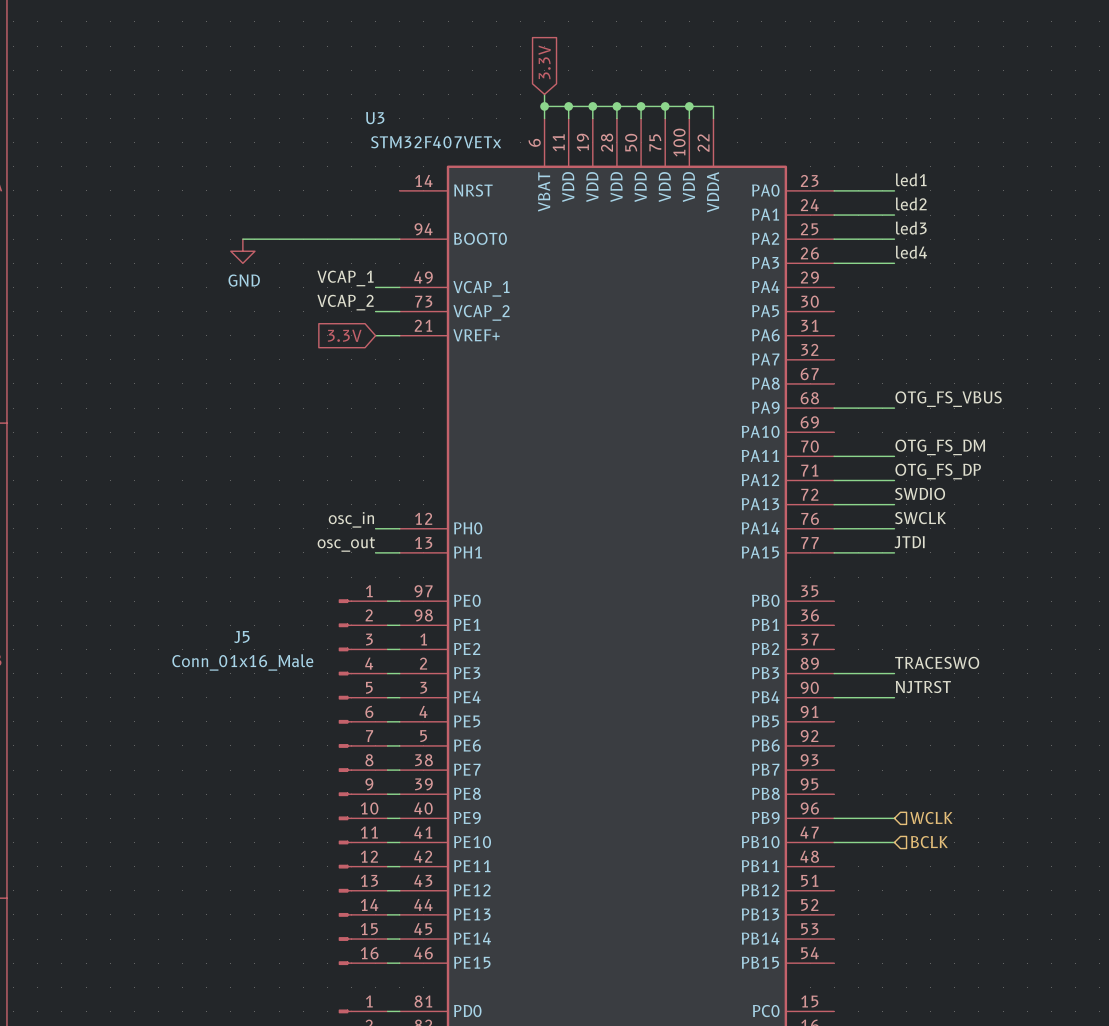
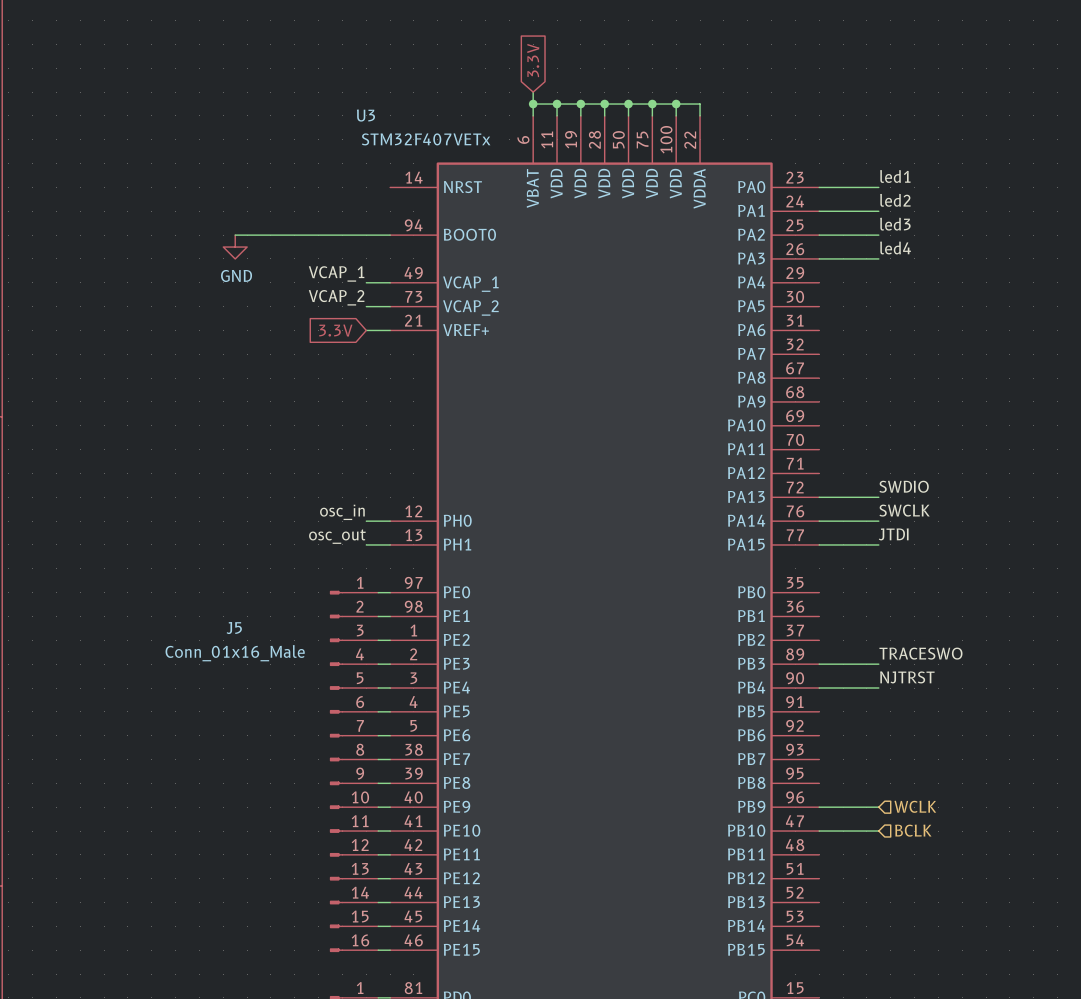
label: OTG_FS_VBUS (948, 399) -> none
wire: (834, 408) (894, 408) -> none
label: OTG_FS_DM (940, 447) -> none
wire: (834, 456) (894, 456) -> none
label: OTG_FS_DP (938, 471) -> none
wire: (834, 480) (894, 480) -> none

